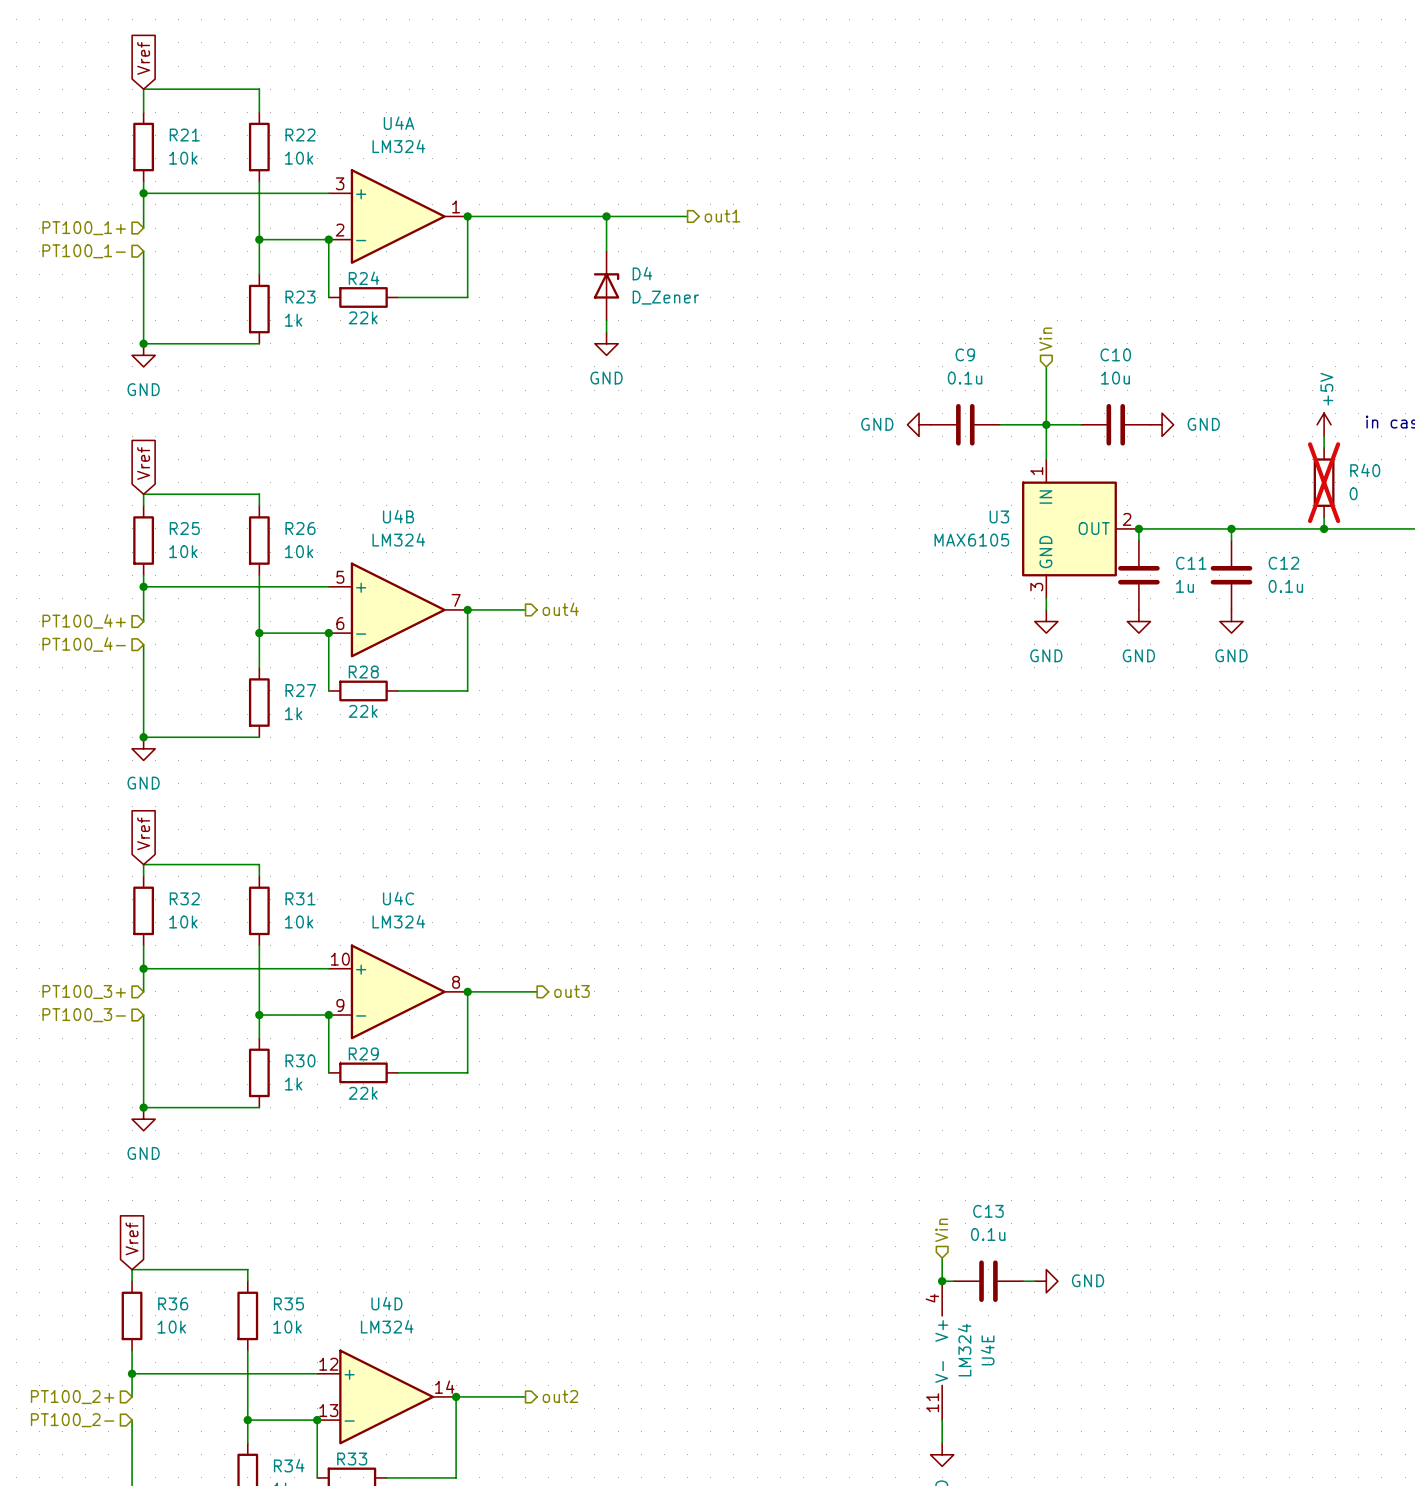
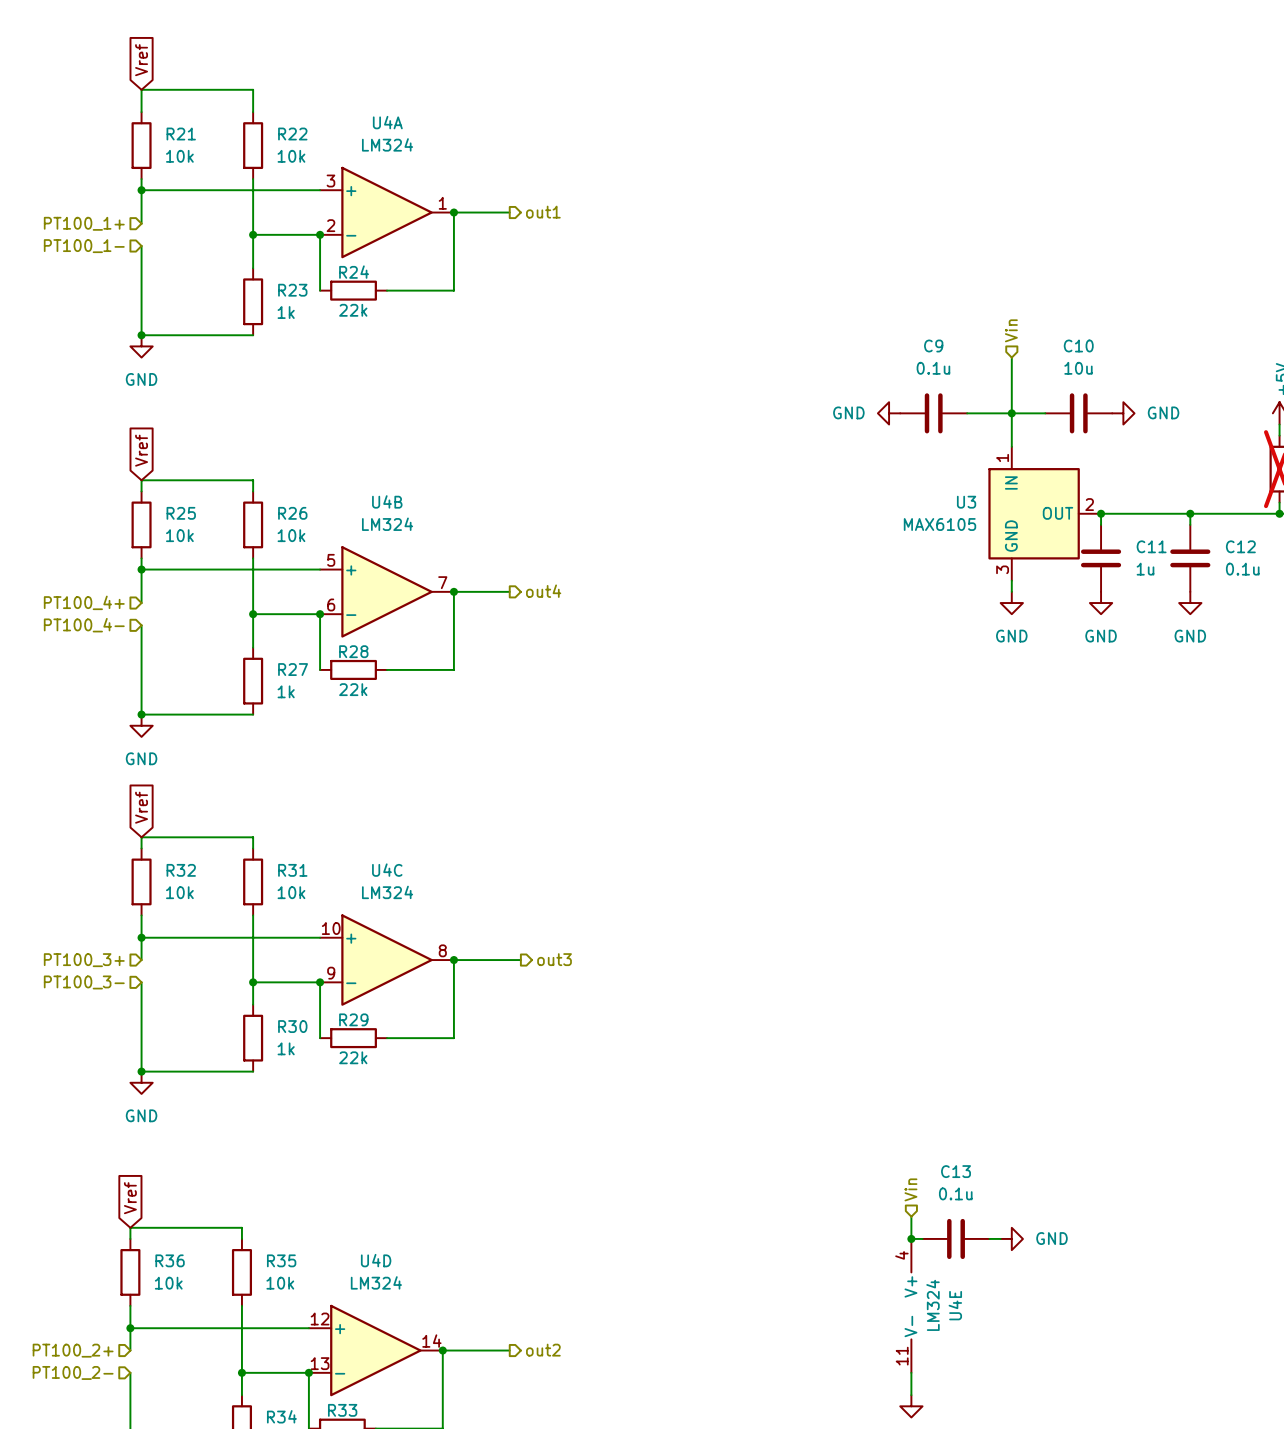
wire: (525, 216) (687, 216) -> none
wire: (606, 216) (606, 251) -> none
junction: (606, 216) -> none
hierarchical label position: out1 (722, 216) -> out1 (543, 212)
D4: D_Zener (606, 285) -> none
wire: (606, 320) (606, 332) -> none
power symbol: GND (606, 343) -> none

